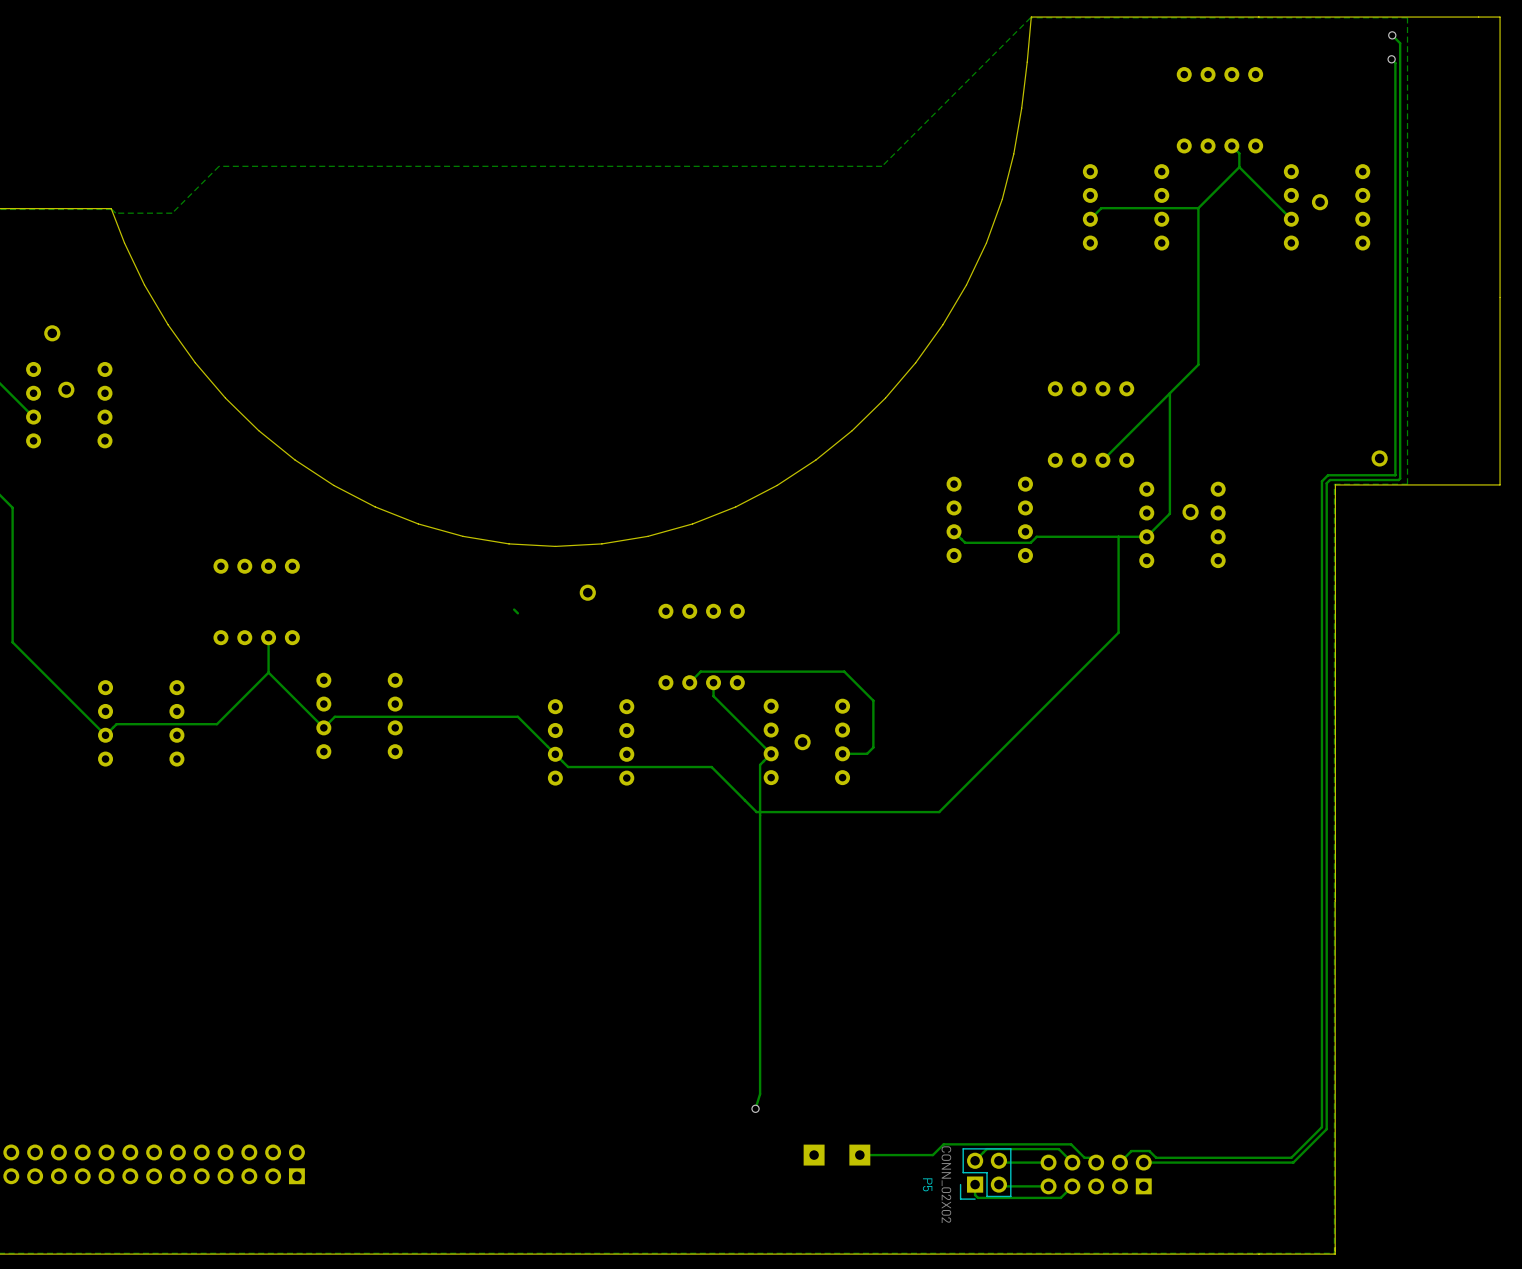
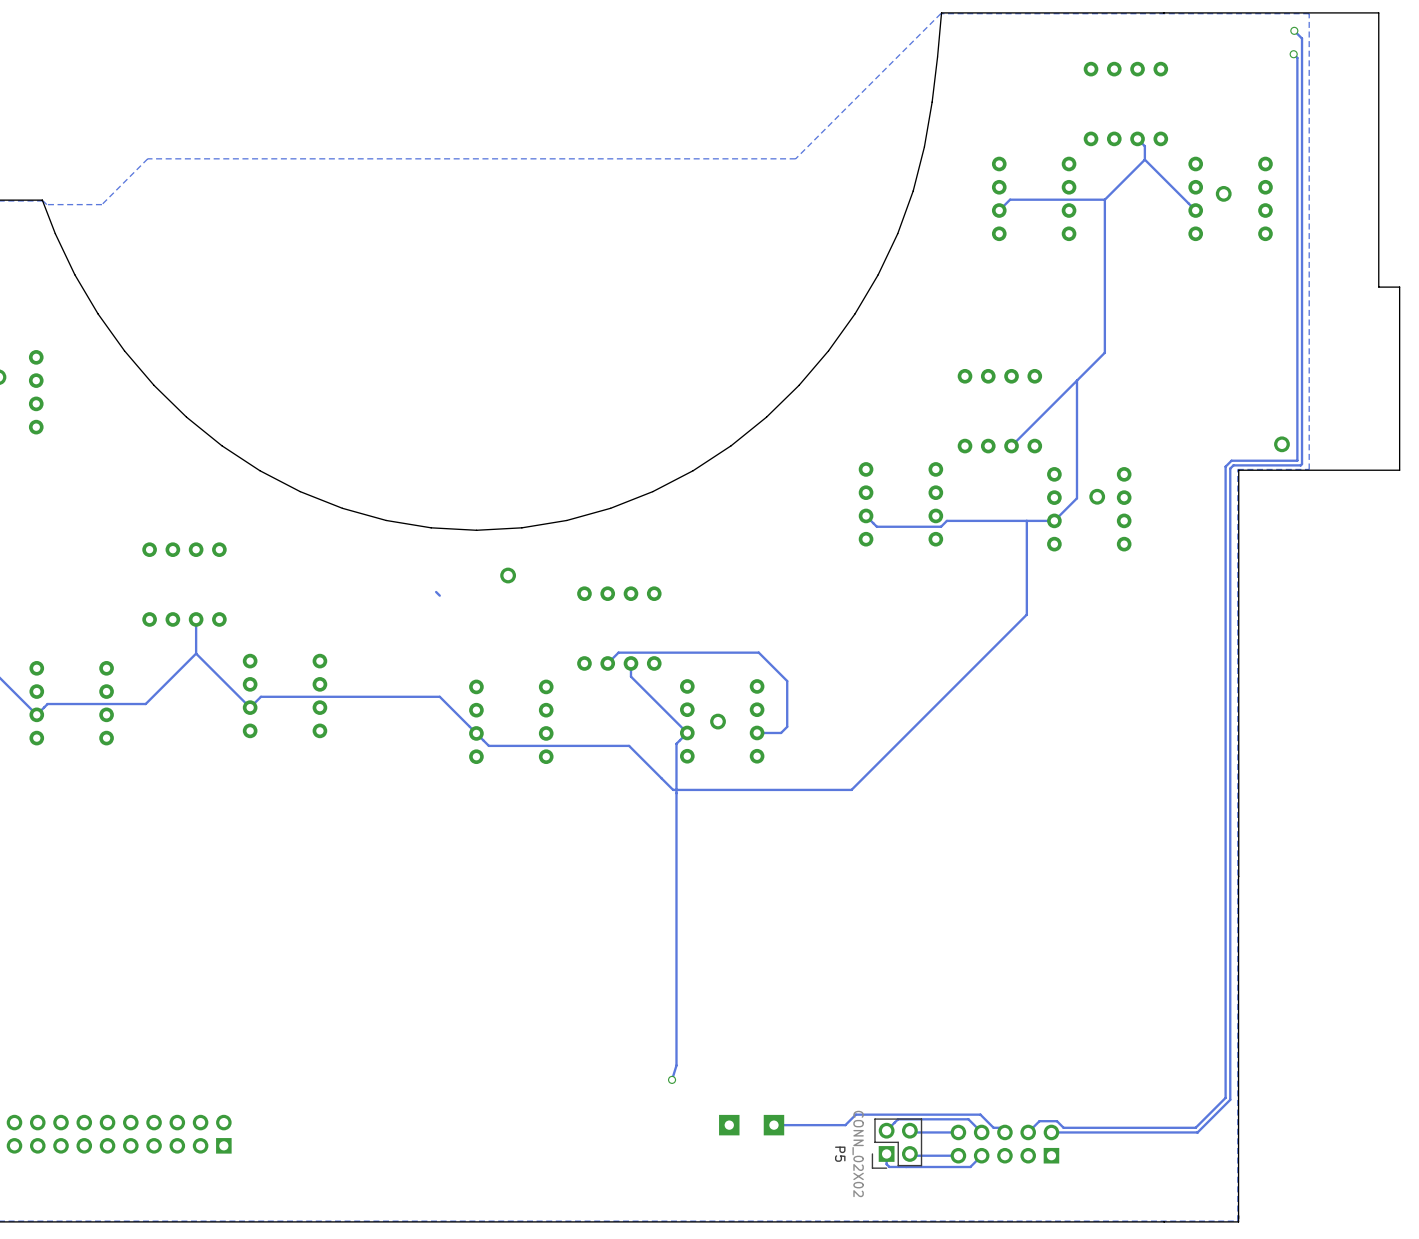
board edge: (1500, 17) (1478, 17) -> (1378, 286) (1378, 12)
board edge: (1500, 17) (1500, 297) -> (1378, 287) (1399, 287)

